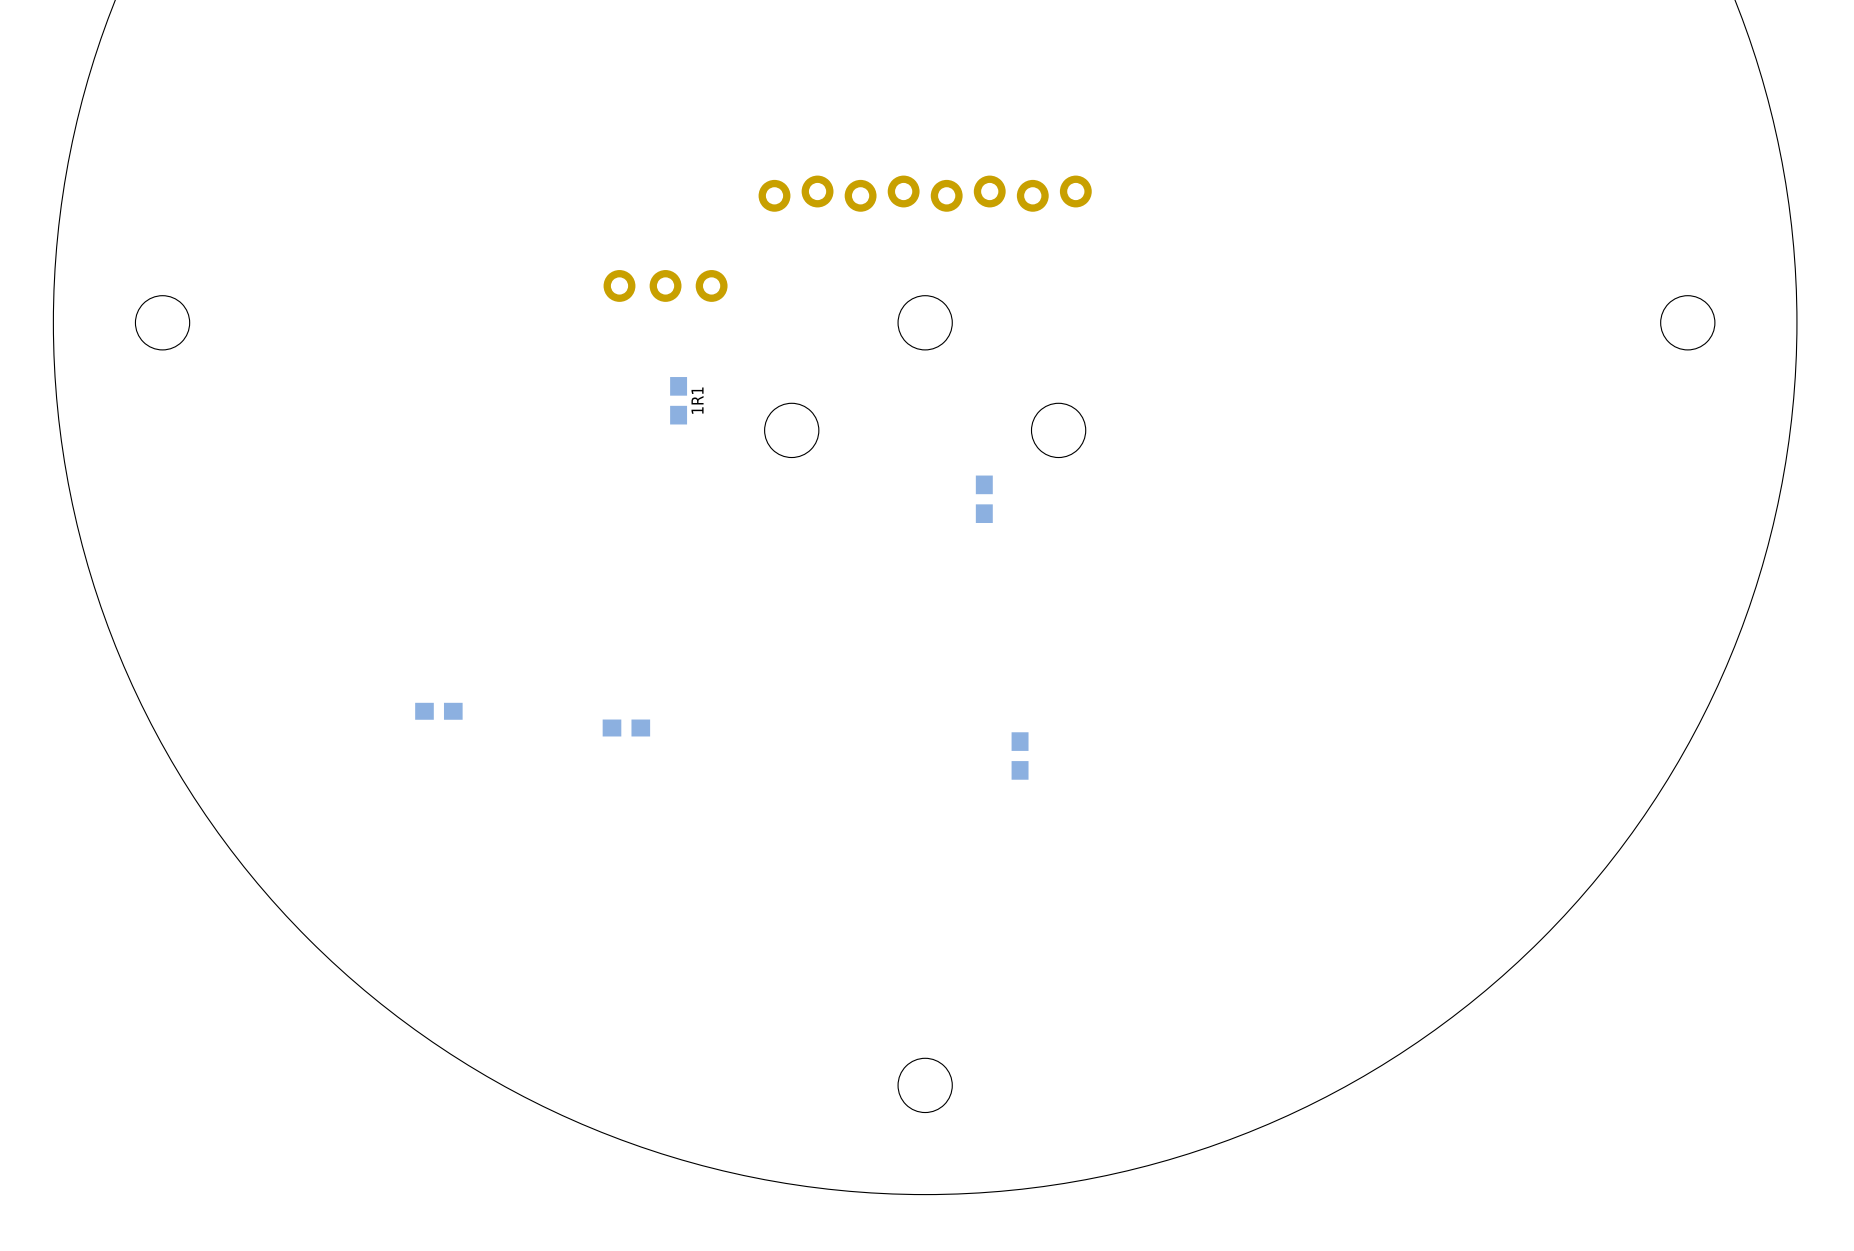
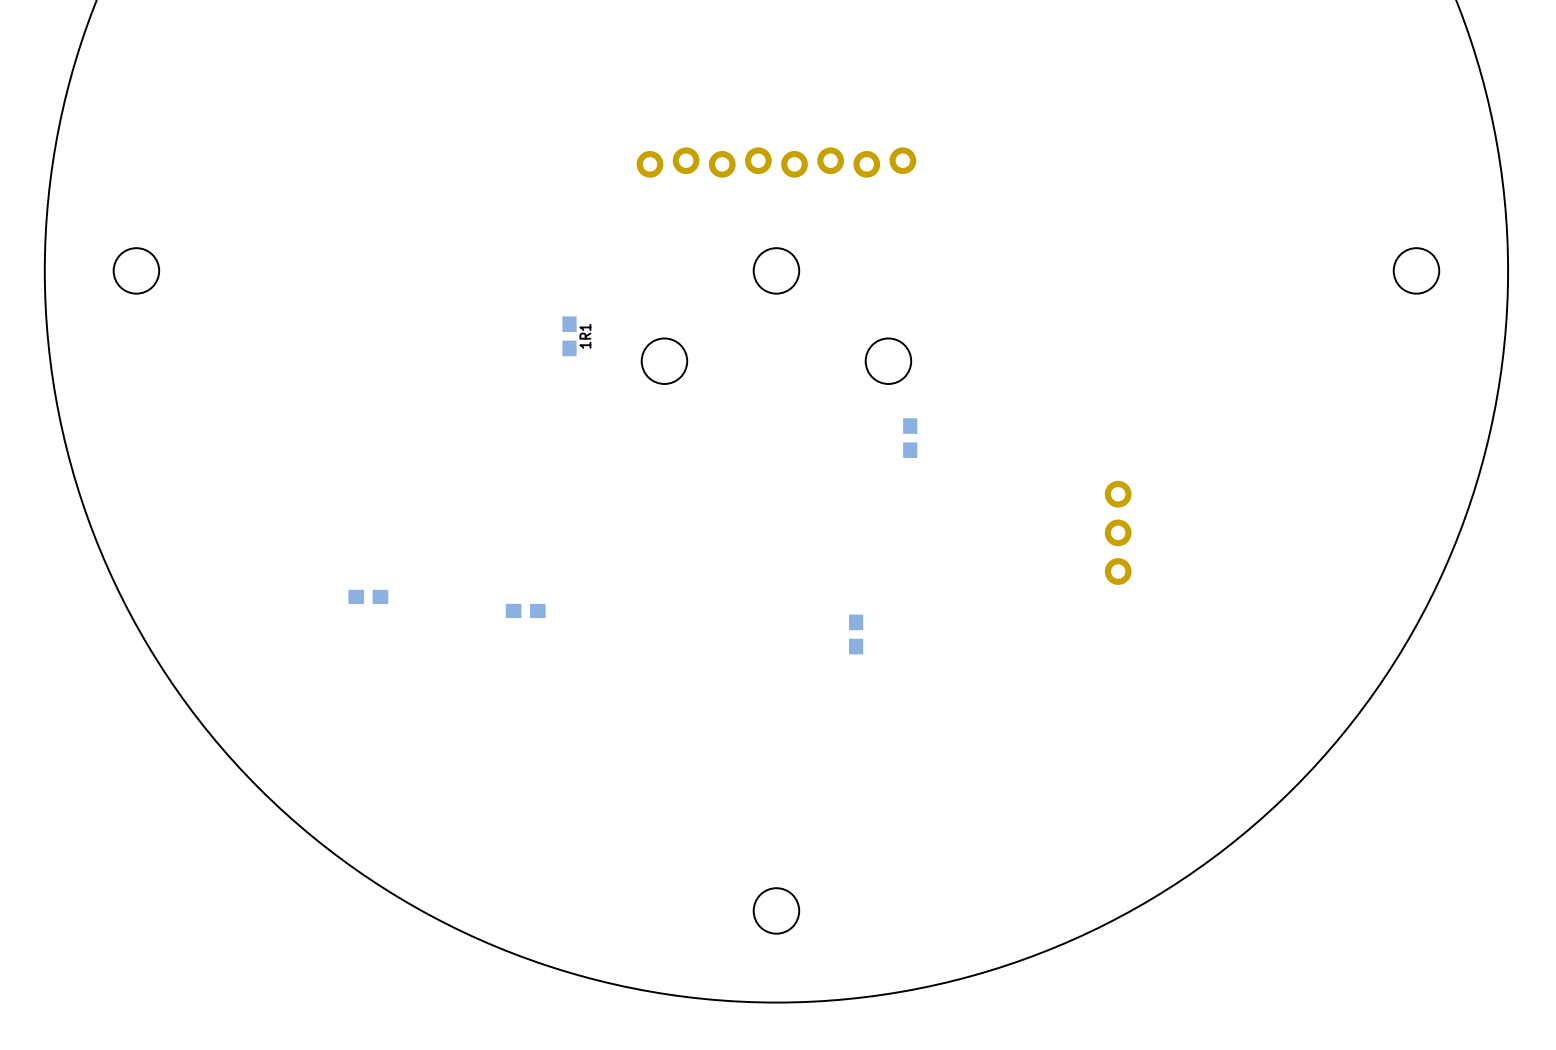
part: (665, 285) -> none
part position: (984, 499) -> (910, 438)
part: none -> (1118, 532)

